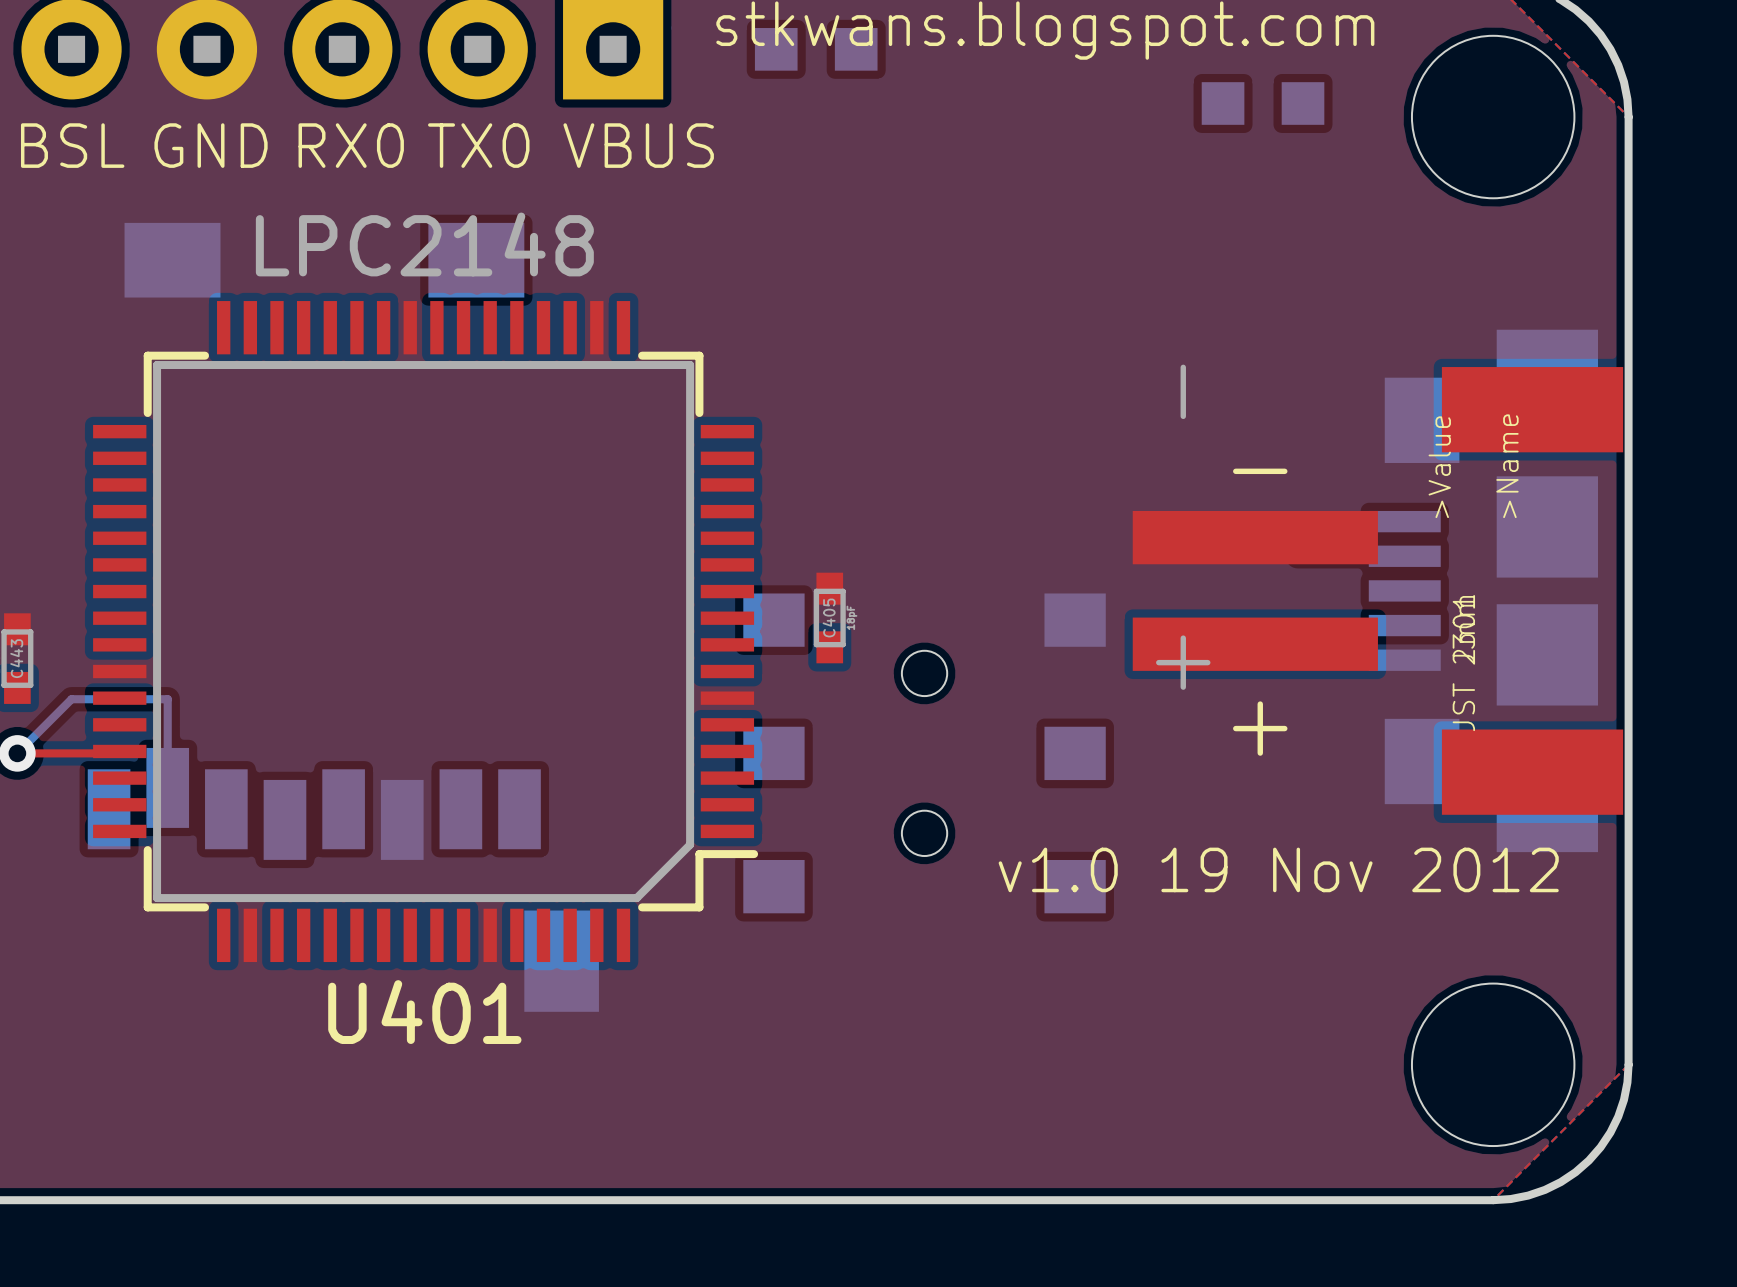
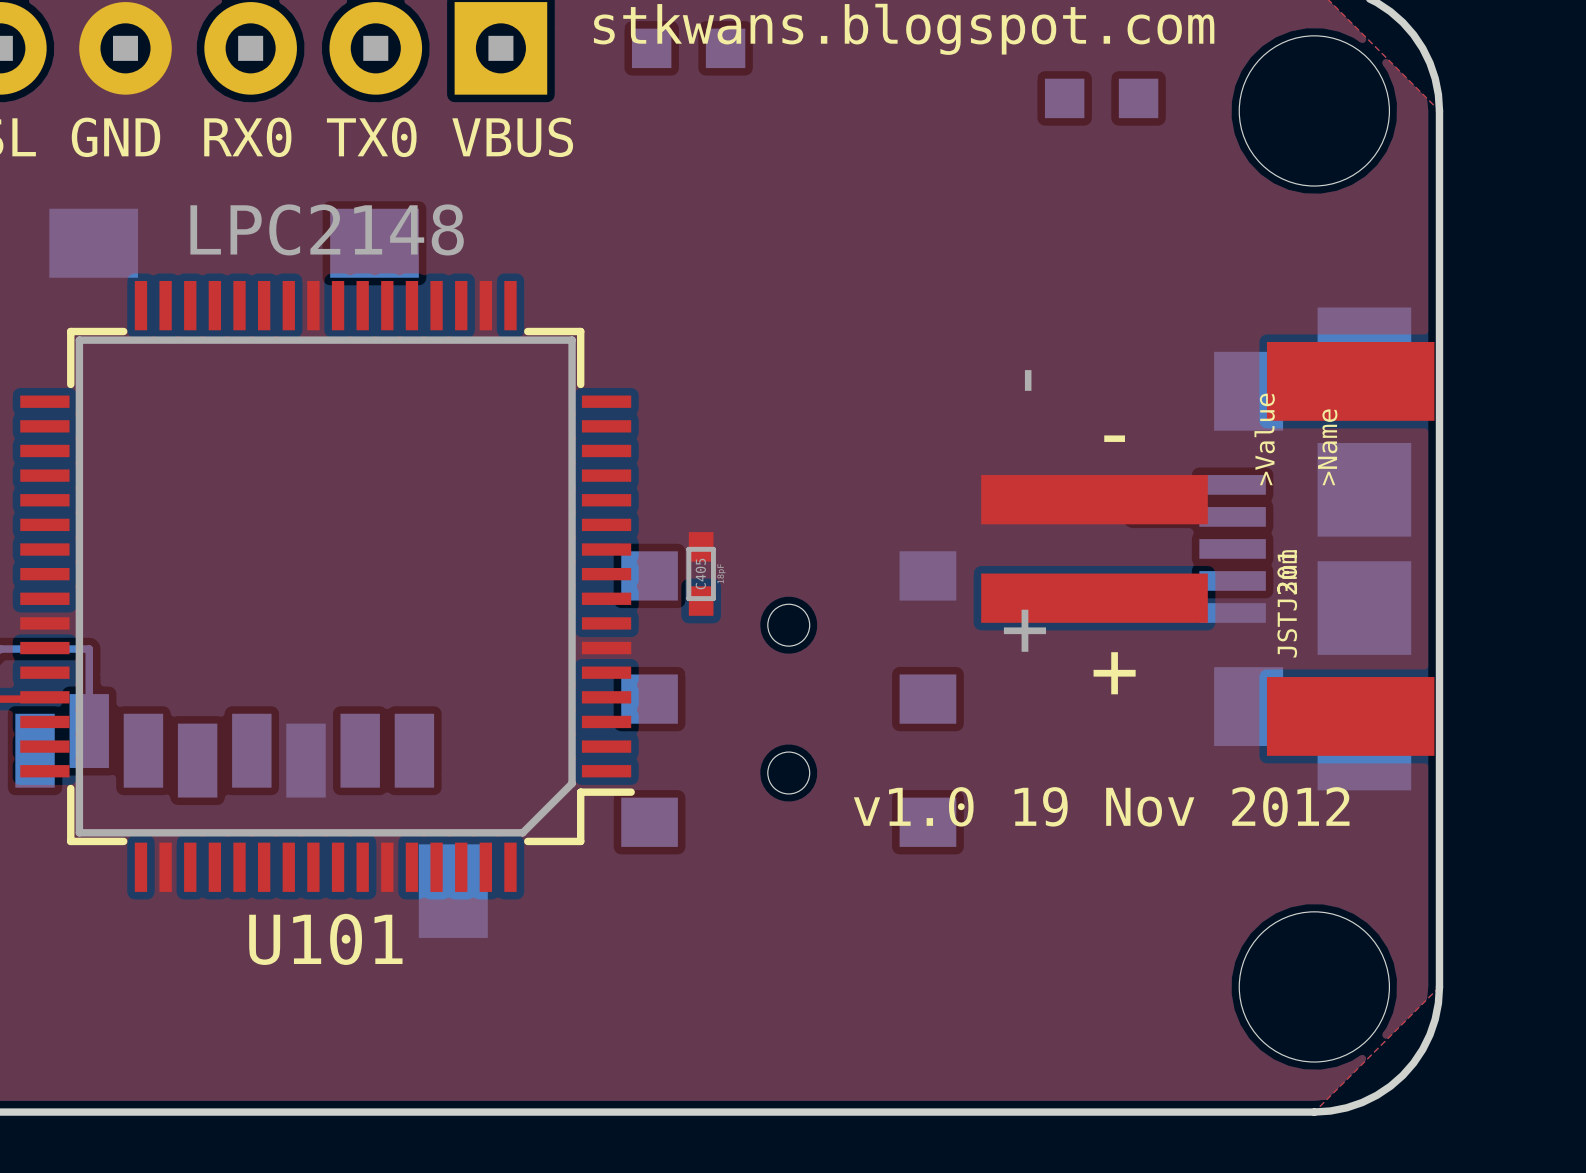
U401 name: U401 (424, 1012) -> U101 (325, 939)

